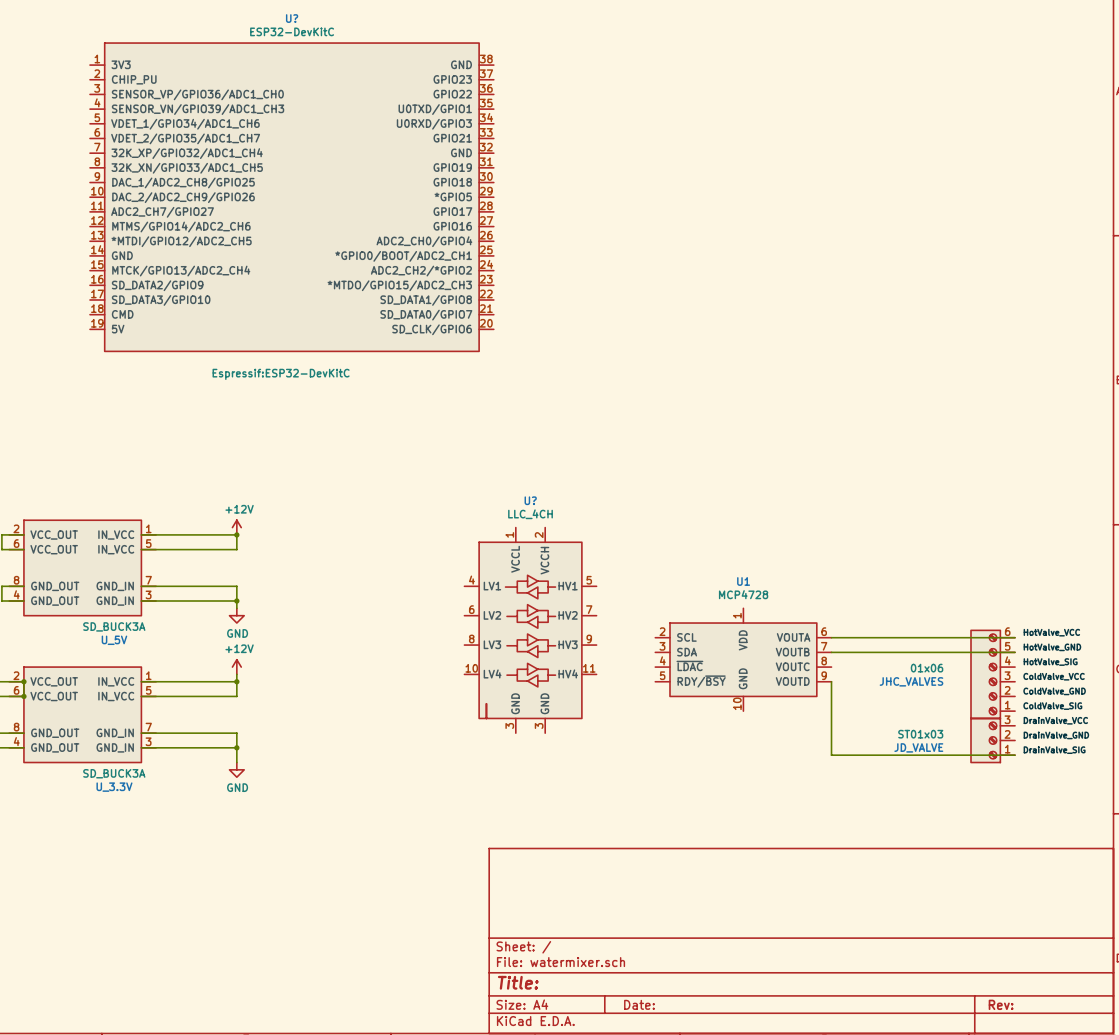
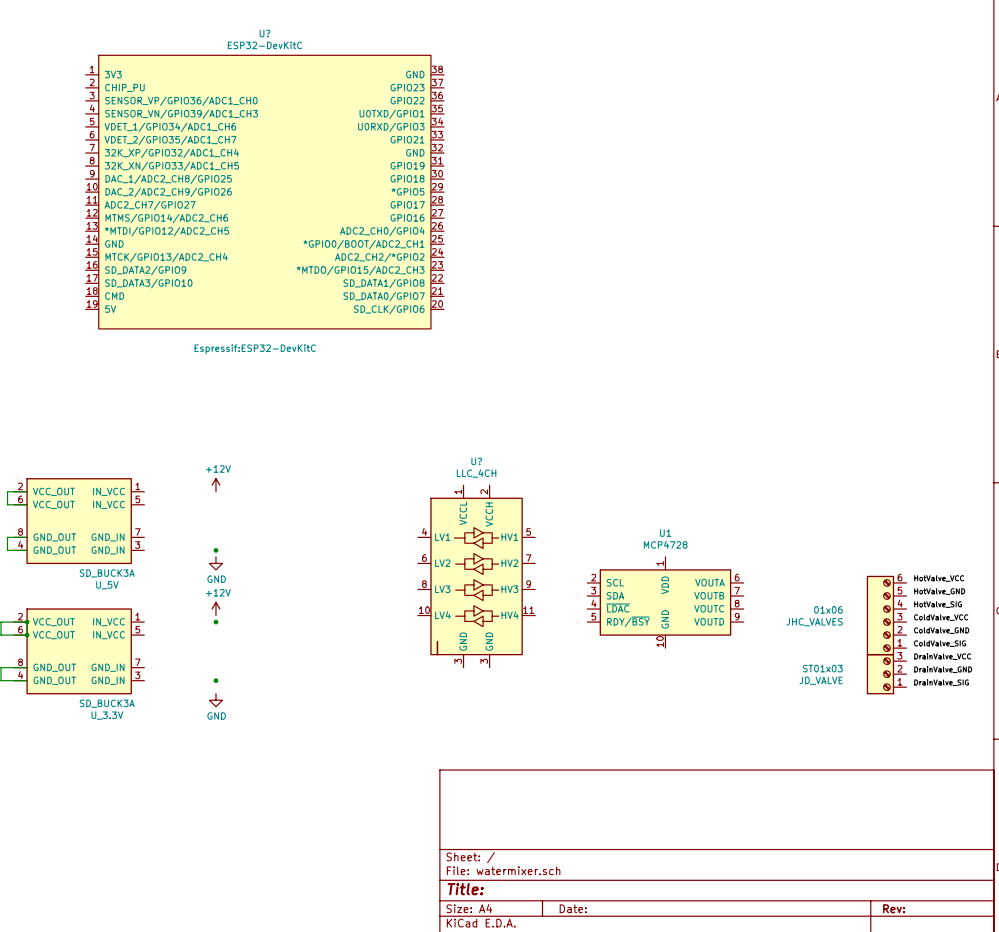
wire: (141, 534) (236, 534) (236, 549) (141, 549) -> none
junction: (236, 534) -> none
wire: (141, 586) (236, 586) (236, 608) -> none
wire: (141, 601) (236, 601) -> none
wire: (831, 637) (1015, 637) -> none
wire: (831, 652) (1015, 652) -> none
wire: (236, 674) (236, 696) (141, 696) -> none
wire: (141, 681) (236, 681) -> none
wire: (831, 681) (831, 755) (1015, 755) -> none
wire: (141, 733) (236, 733) (236, 762) -> none
wire: (141, 747) (236, 747) -> none

